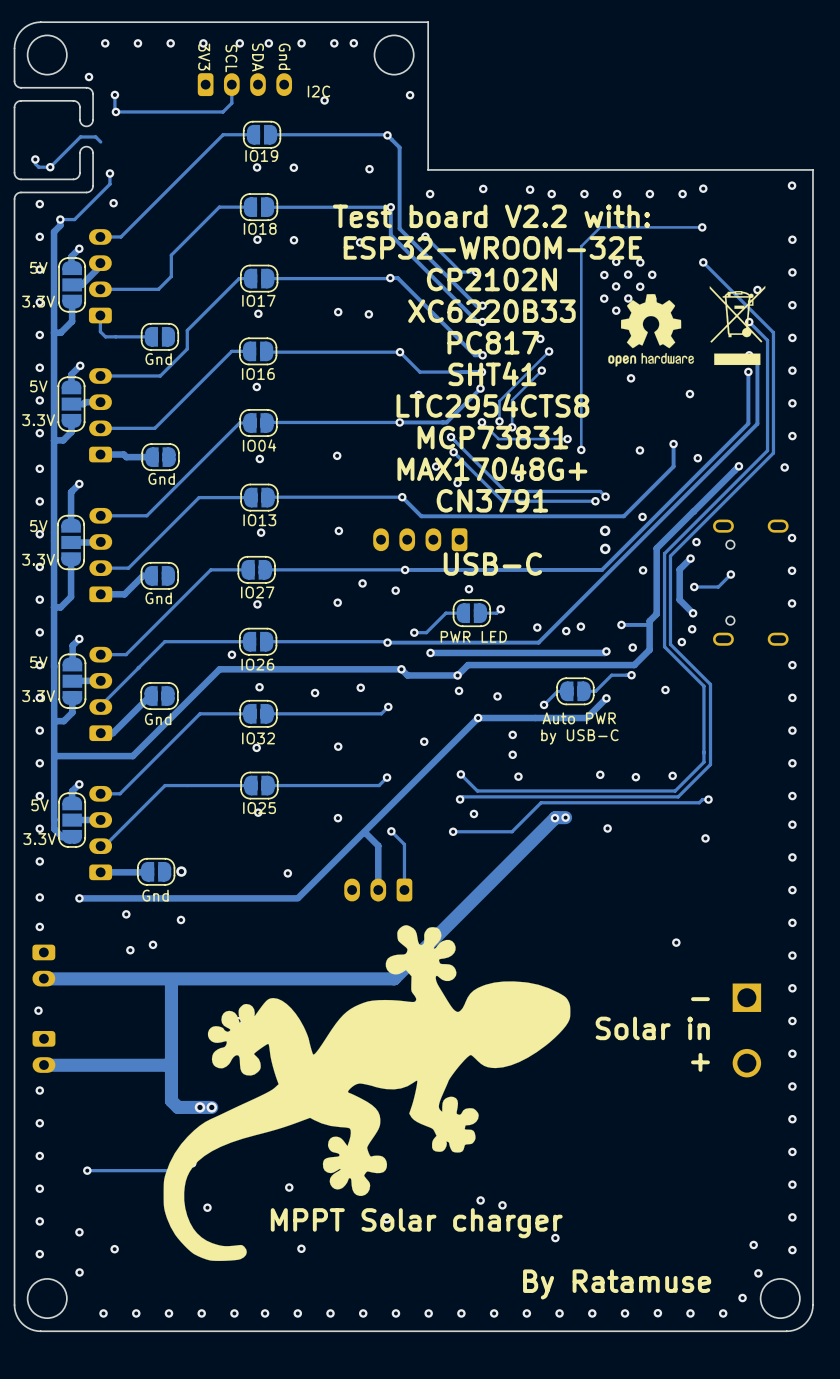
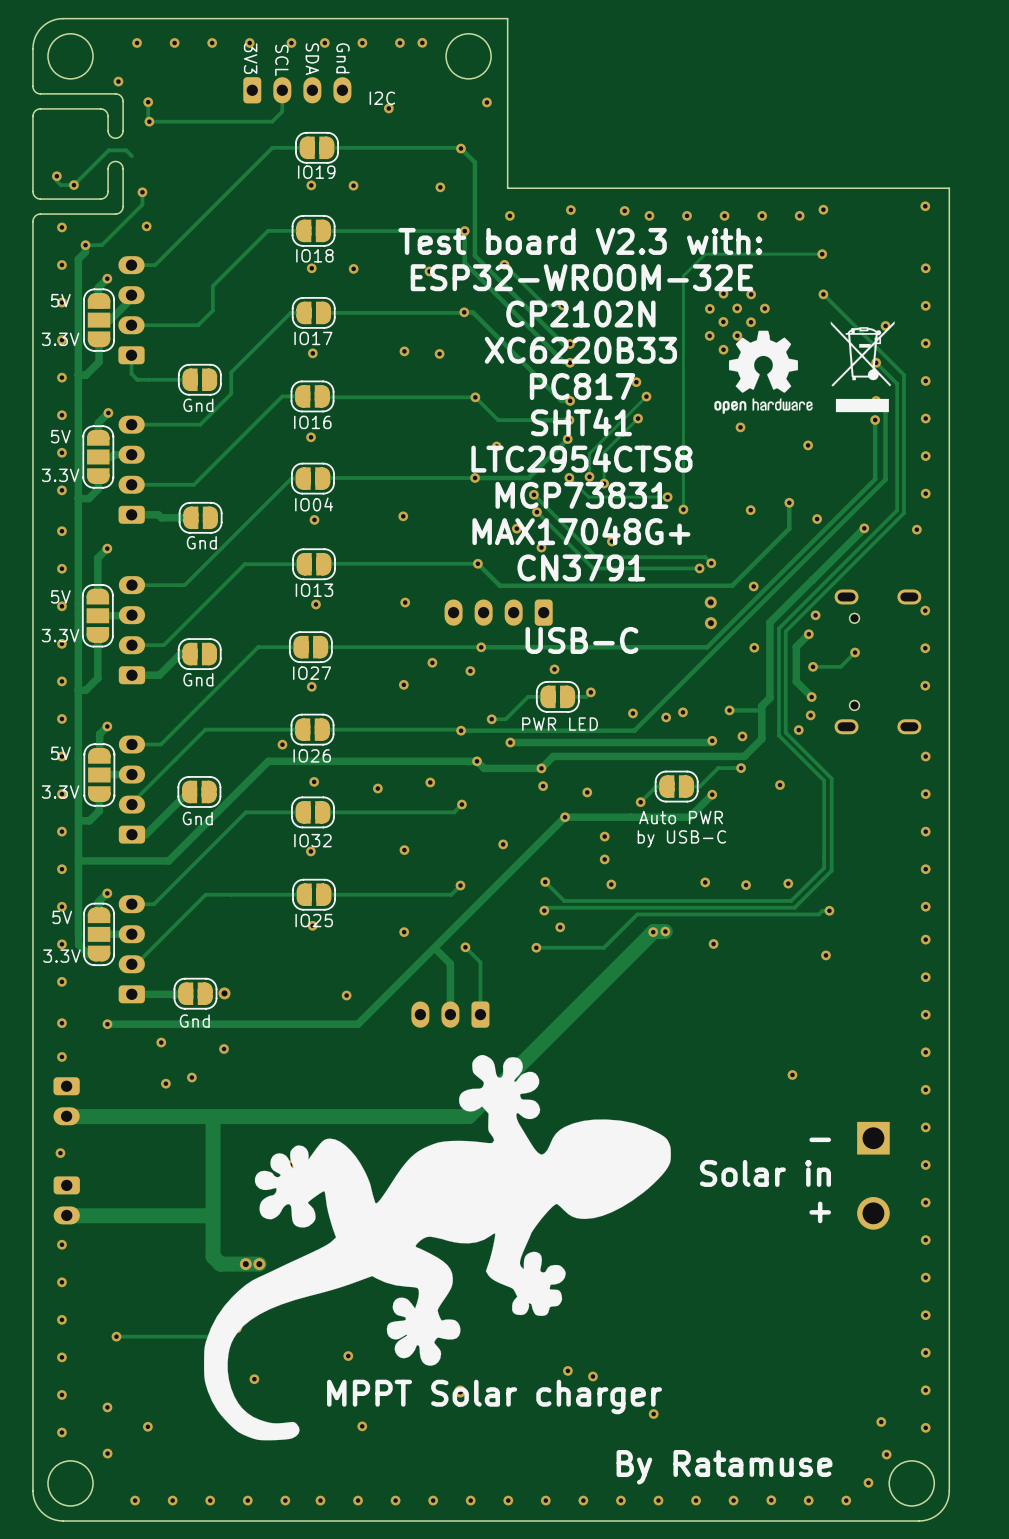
text: Test board V2.2 with: (491, 216) -> Test board V2.3 with: (580, 241)

